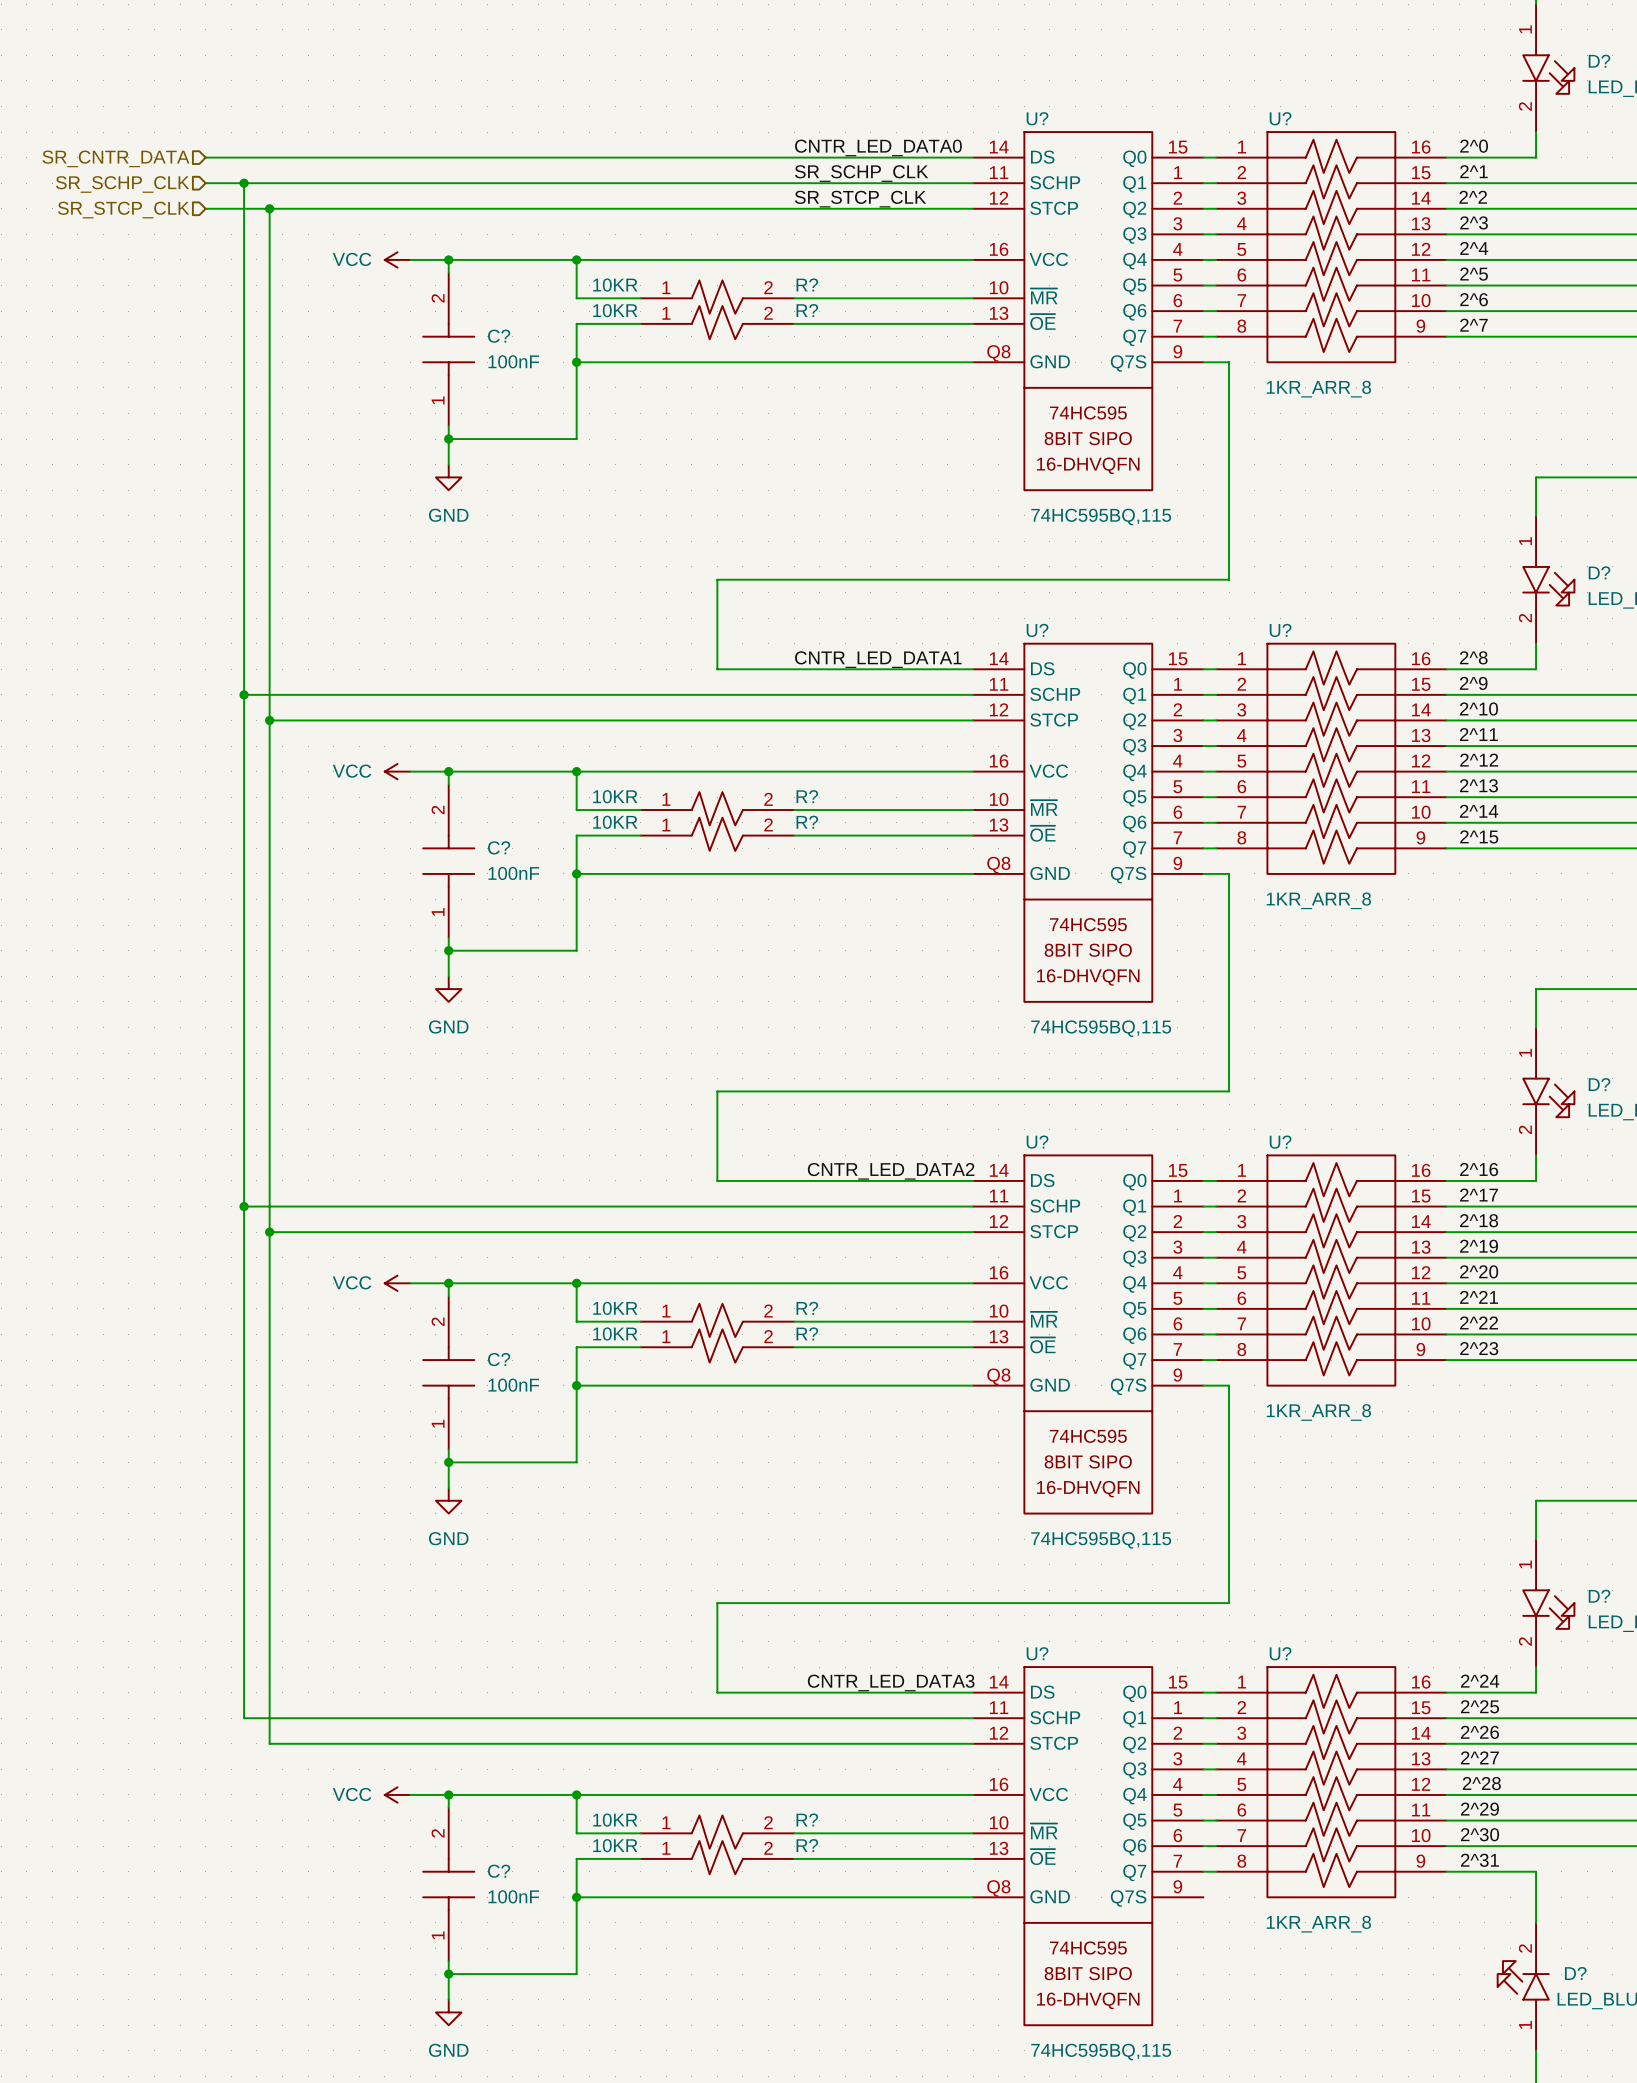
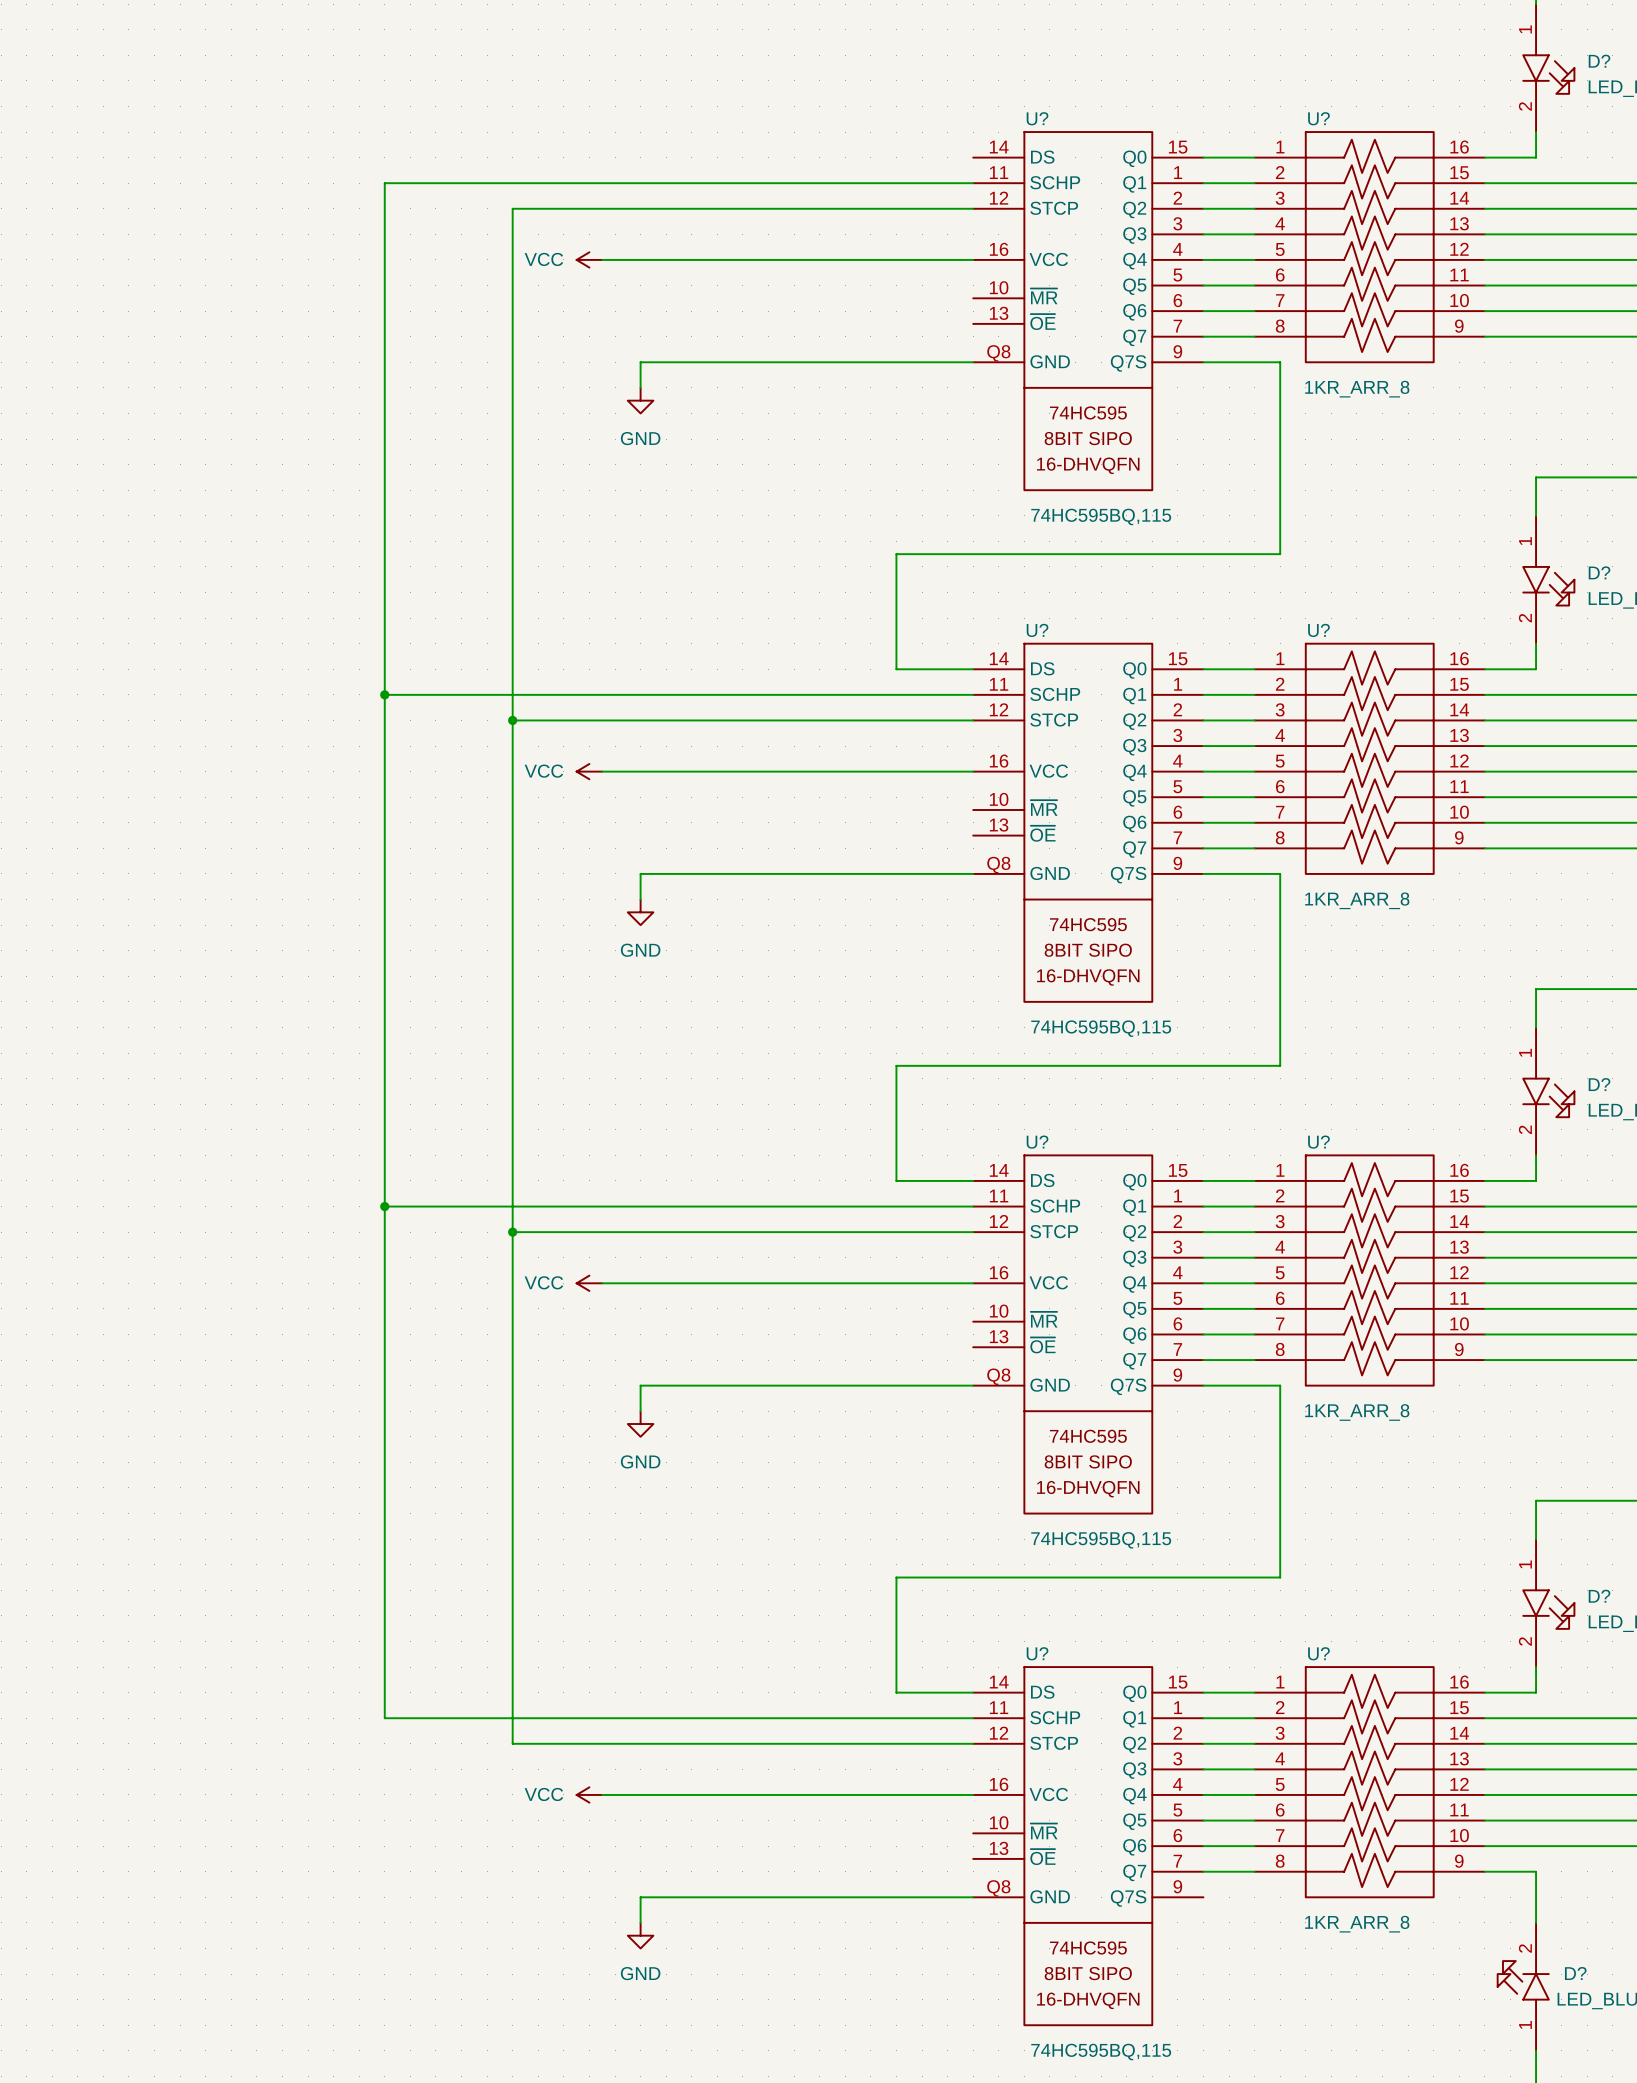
label: 2^0 (1474, 146) -> none
label: CNTR_LED_DATA0 (878, 147) -> none
wire: (205, 157) (973, 157) -> none
hierarchical label: SR_CNTR_DATA (115, 158) -> none
label: 2^1 (1474, 171) -> none
label: SR_SCHP_CLK (861, 173) -> none
wire: (205, 183) (384, 183) -> none
wire: (244, 183) (244, 1718) (384, 1718) -> (384, 183) (384, 1718)
junction: (244, 183) -> none
hierarchical label: SR_SCHP_CLK (122, 184) -> none
label: 2^2 (1473, 197) -> none
label: SR_STCP_CLK (860, 199) -> none
wire: (205, 208) (512, 208) -> none
wire: (269, 208) (269, 1743) (512, 1743) -> (512, 208) (512, 1743)
junction: (269, 208) -> none
hierarchical label: SR_STCP_CLK (123, 210) -> none
label: 2^3 (1474, 222) -> none
U? position: (1331, 247) -> (1369, 247)
label: 2^4 (1474, 248) -> none
power symbol position: VCC (397, 259) -> VCC (589, 259)
wire: (410, 259) (602, 259) -> none
wire: (448, 259) (448, 272) -> none
junction: (448, 259) -> none
wire: (576, 259) (576, 298) (640, 298) -> none
junction: (576, 259) -> none
label: 2^5 (1474, 274) -> none
R?: 10KR (717, 297) -> none
wire: (794, 298) (973, 298) -> none
label: 2^6 (1474, 299) -> none
R?: 10KR (717, 322) -> none
wire: (640, 323) (576, 323) (576, 439) (448, 439) -> none
wire: (794, 323) (973, 323) -> none
label: 2^7 (1473, 325) -> none
C?: 100nF (448, 349) -> none
wire: (576, 362) (640, 362) -> (640, 387) (640, 362)
junction: (576, 362) -> none
wire: (1229, 362) (1229, 579) (717, 579) (717, 669) (896, 669) -> (1229, 362) (1280, 362) (1280, 554) (896, 554) (896, 669)
wire: (448, 426) (448, 464) -> none
junction: (448, 439) -> none
power symbol position: GND (448, 477) -> GND (640, 400)
label: 2^8 (1473, 657) -> none
label: CNTR_LED_DATA1 (878, 659) -> none
label: 2^9 (1473, 683) -> none
wire: (244, 694) (384, 694) -> none
junction: (244, 694) -> none
junction: none -> (384, 694)
label: 2^10 (1478, 709) -> none
wire: (269, 720) (512, 720) -> none
junction: (269, 720) -> none
junction: none -> (512, 720)
label: 2^11 (1478, 734) -> none
U? position: (1331, 758) -> (1369, 758)
label: 2^12 (1479, 760) -> none
power symbol position: VCC (397, 771) -> VCC (589, 771)
wire: (410, 771) (602, 771) -> none
wire: (448, 771) (448, 784) -> none
junction: (448, 771) -> none
wire: (576, 771) (576, 810) (640, 810) -> none
junction: (576, 771) -> none
label: 2^13 (1478, 785) -> none
R?: 10KR (717, 808) -> none
wire: (794, 810) (973, 810) -> none
label: 2^14 (1479, 811) -> none
R?: 10KR (717, 834) -> none
wire: (640, 835) (576, 835) (576, 950) (448, 950) -> none
wire: (794, 835) (973, 835) -> none
label: 2^15 (1479, 836) -> none
C?: 100nF (448, 861) -> none
wire: (576, 873) (640, 873) -> (640, 899) (640, 873)
junction: (576, 873) -> none
wire: (1229, 873) (1229, 1091) (717, 1091) (717, 1180) (896, 1180) -> (1229, 873) (1280, 873) (1280, 1065) (896, 1065) (896, 1180)
wire: (448, 937) (448, 976) -> none
junction: (448, 950) -> none
power symbol position: GND (448, 989) -> GND (640, 912)
label: 2^16 (1479, 1169) -> none
label: CNTR_LED_DATA2 (891, 1171) -> none
label: 2^17 (1479, 1195) -> none
wire: (244, 1206) (384, 1206) -> none
junction: (244, 1206) -> none
junction: none -> (384, 1206)
label: 2^18 (1479, 1220) -> none
wire: (269, 1232) (512, 1232) -> none
junction: (269, 1232) -> none
junction: none -> (512, 1232)
label: 2^19 (1479, 1246) -> none
U? position: (1331, 1270) -> (1369, 1270)
label: 2^20 (1479, 1271) -> none
power symbol position: VCC (397, 1283) -> VCC (589, 1283)
wire: (410, 1283) (602, 1283) -> none
wire: (448, 1283) (448, 1296) -> none
junction: (448, 1283) -> none
wire: (576, 1283) (576, 1321) (640, 1321) -> none
junction: (576, 1283) -> none
label: 2^21 (1479, 1297) -> none
R?: 10KR (717, 1320) -> none
wire: (794, 1321) (973, 1321) -> none
label: 2^22 (1479, 1322) -> none
R?: 10KR (717, 1345) -> none
wire: (640, 1347) (576, 1347) (576, 1462) (448, 1462) -> none
wire: (794, 1347) (973, 1347) -> none
label: 2^23 (1479, 1348) -> none
C?: 100nF (448, 1372) -> none
wire: (576, 1385) (640, 1385) -> (640, 1411) (640, 1385)
junction: (576, 1385) -> none
wire: (1229, 1385) (1229, 1603) (717, 1603) (717, 1692) (896, 1692) -> (1229, 1385) (1280, 1385) (1280, 1577) (896, 1577) (896, 1692)
wire: (448, 1449) (448, 1487) -> none
junction: (448, 1462) -> none
power symbol position: GND (448, 1500) -> GND (640, 1424)
label: 2^24 (1480, 1681) -> none
label: CNTR_LED_DATA3 (891, 1682) -> none
label: 2^25 (1480, 1706) -> none
label: 2^26 (1479, 1732) -> none
label: 2^27 (1479, 1757) -> none
U? position: (1331, 1782) -> (1369, 1782)
label: 2^28 (1481, 1783) -> none
power symbol position: VCC (397, 1794) -> VCC (589, 1794)
wire: (410, 1794) (602, 1794) -> none
wire: (448, 1794) (448, 1807) -> none
junction: (448, 1794) -> none
wire: (576, 1794) (576, 1833) (640, 1833) -> none
junction: (576, 1794) -> none
label: 2^29 (1479, 1809) -> none
R?: 10KR (717, 1832) -> none
wire: (794, 1833) (973, 1833) -> none
label: 2^30 (1480, 1834) -> none
R?: 10KR (717, 1857) -> none
wire: (640, 1858) (576, 1858) (576, 1974) (448, 1974) -> none
wire: (794, 1858) (973, 1858) -> none
label: 2^31 (1479, 1860) -> none
C?: 100nF (448, 1884) -> none
wire: (576, 1897) (640, 1897) -> (640, 1922) (640, 1897)
junction: (576, 1897) -> none
wire: (448, 1961) (448, 1999) -> none
junction: (448, 1974) -> none
power symbol position: GND (448, 2012) -> GND (640, 1935)

